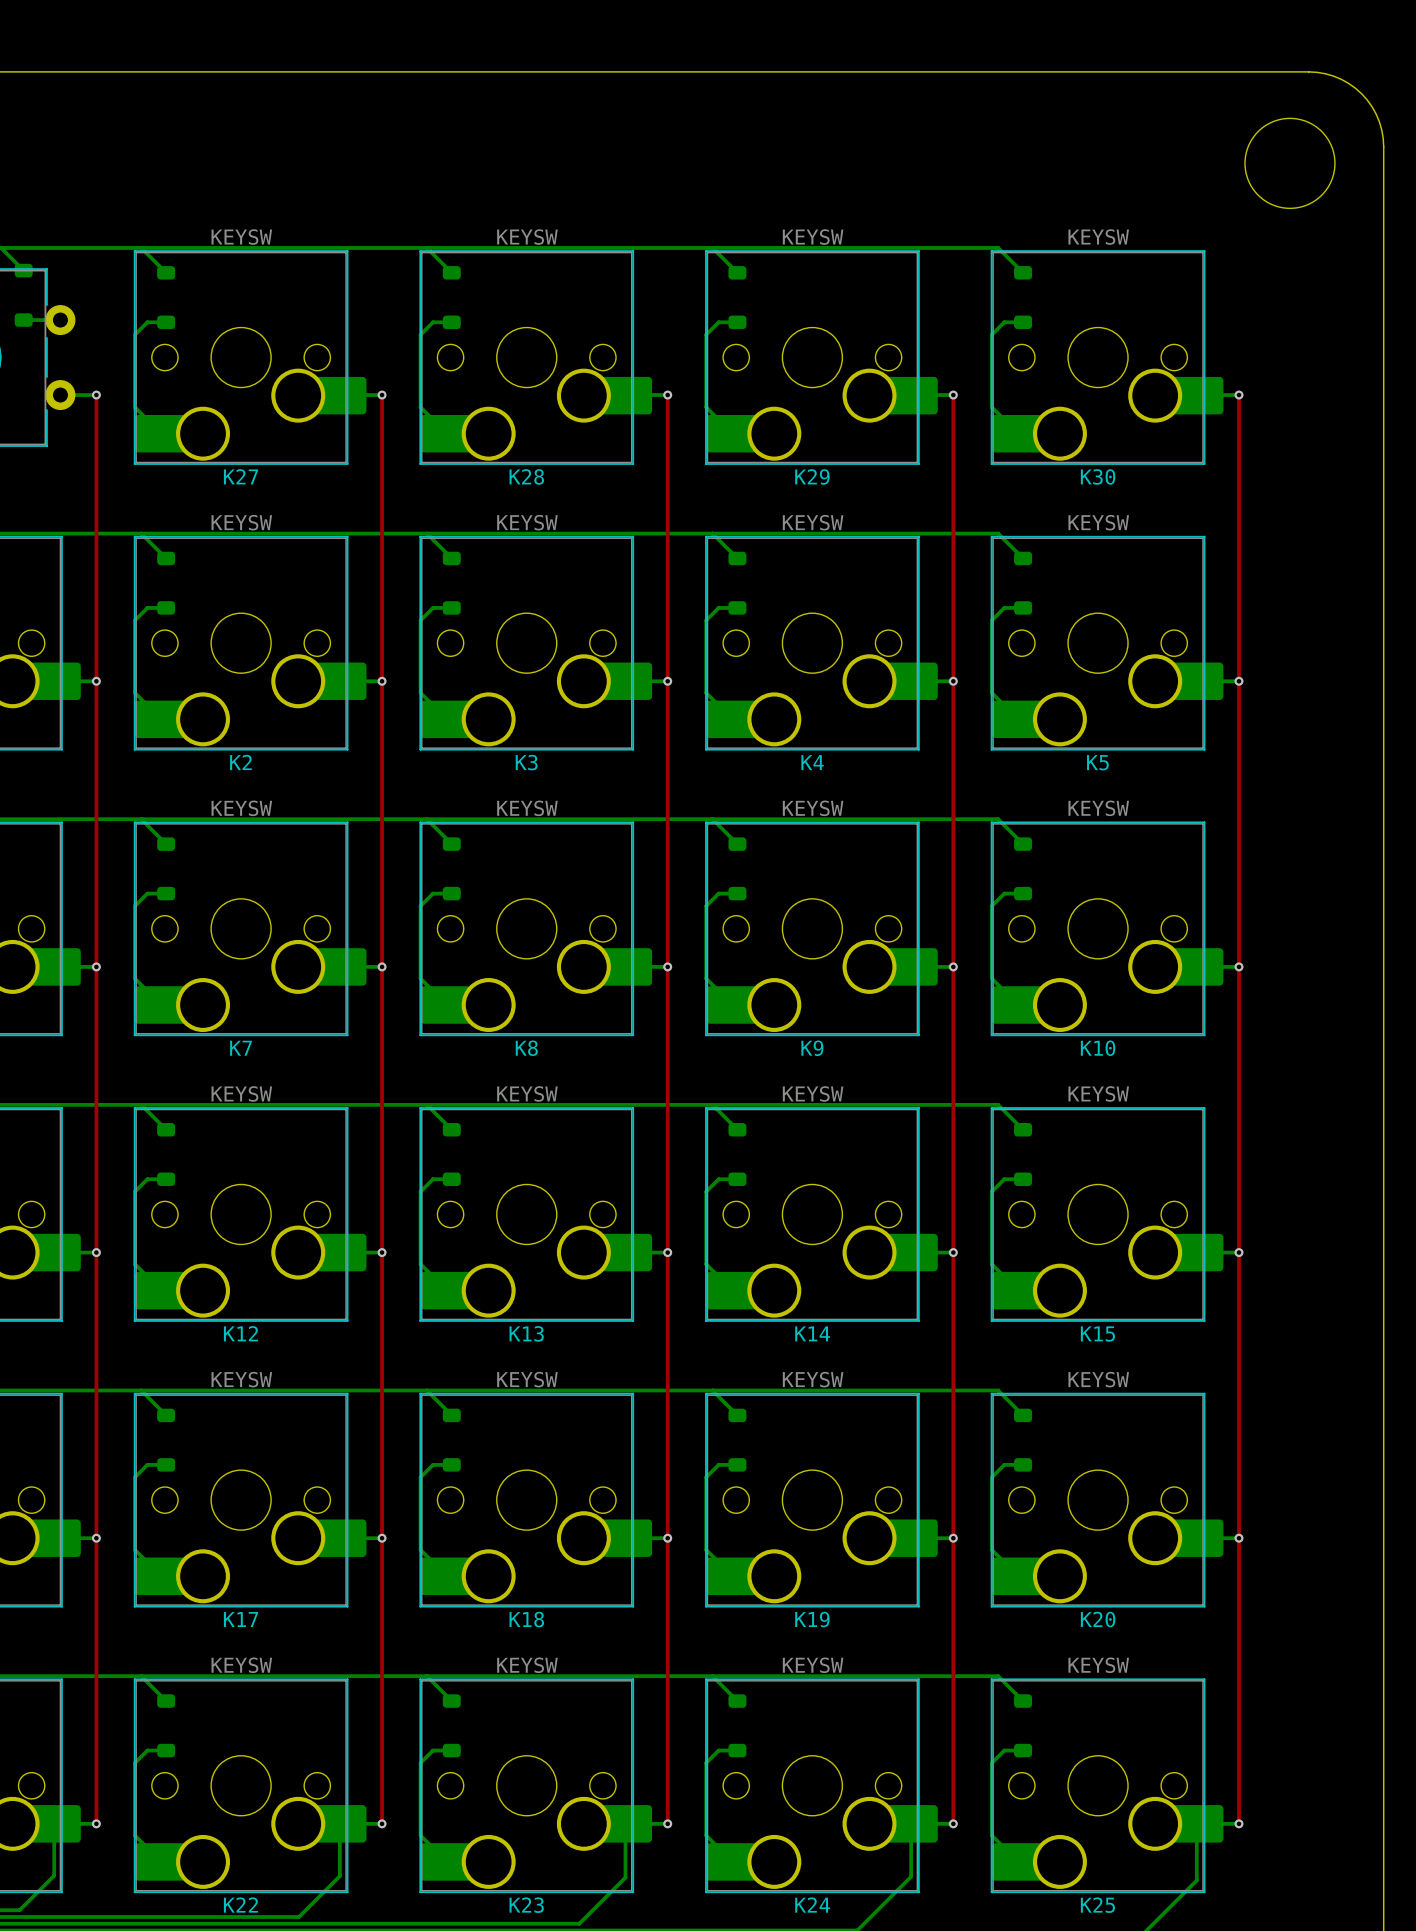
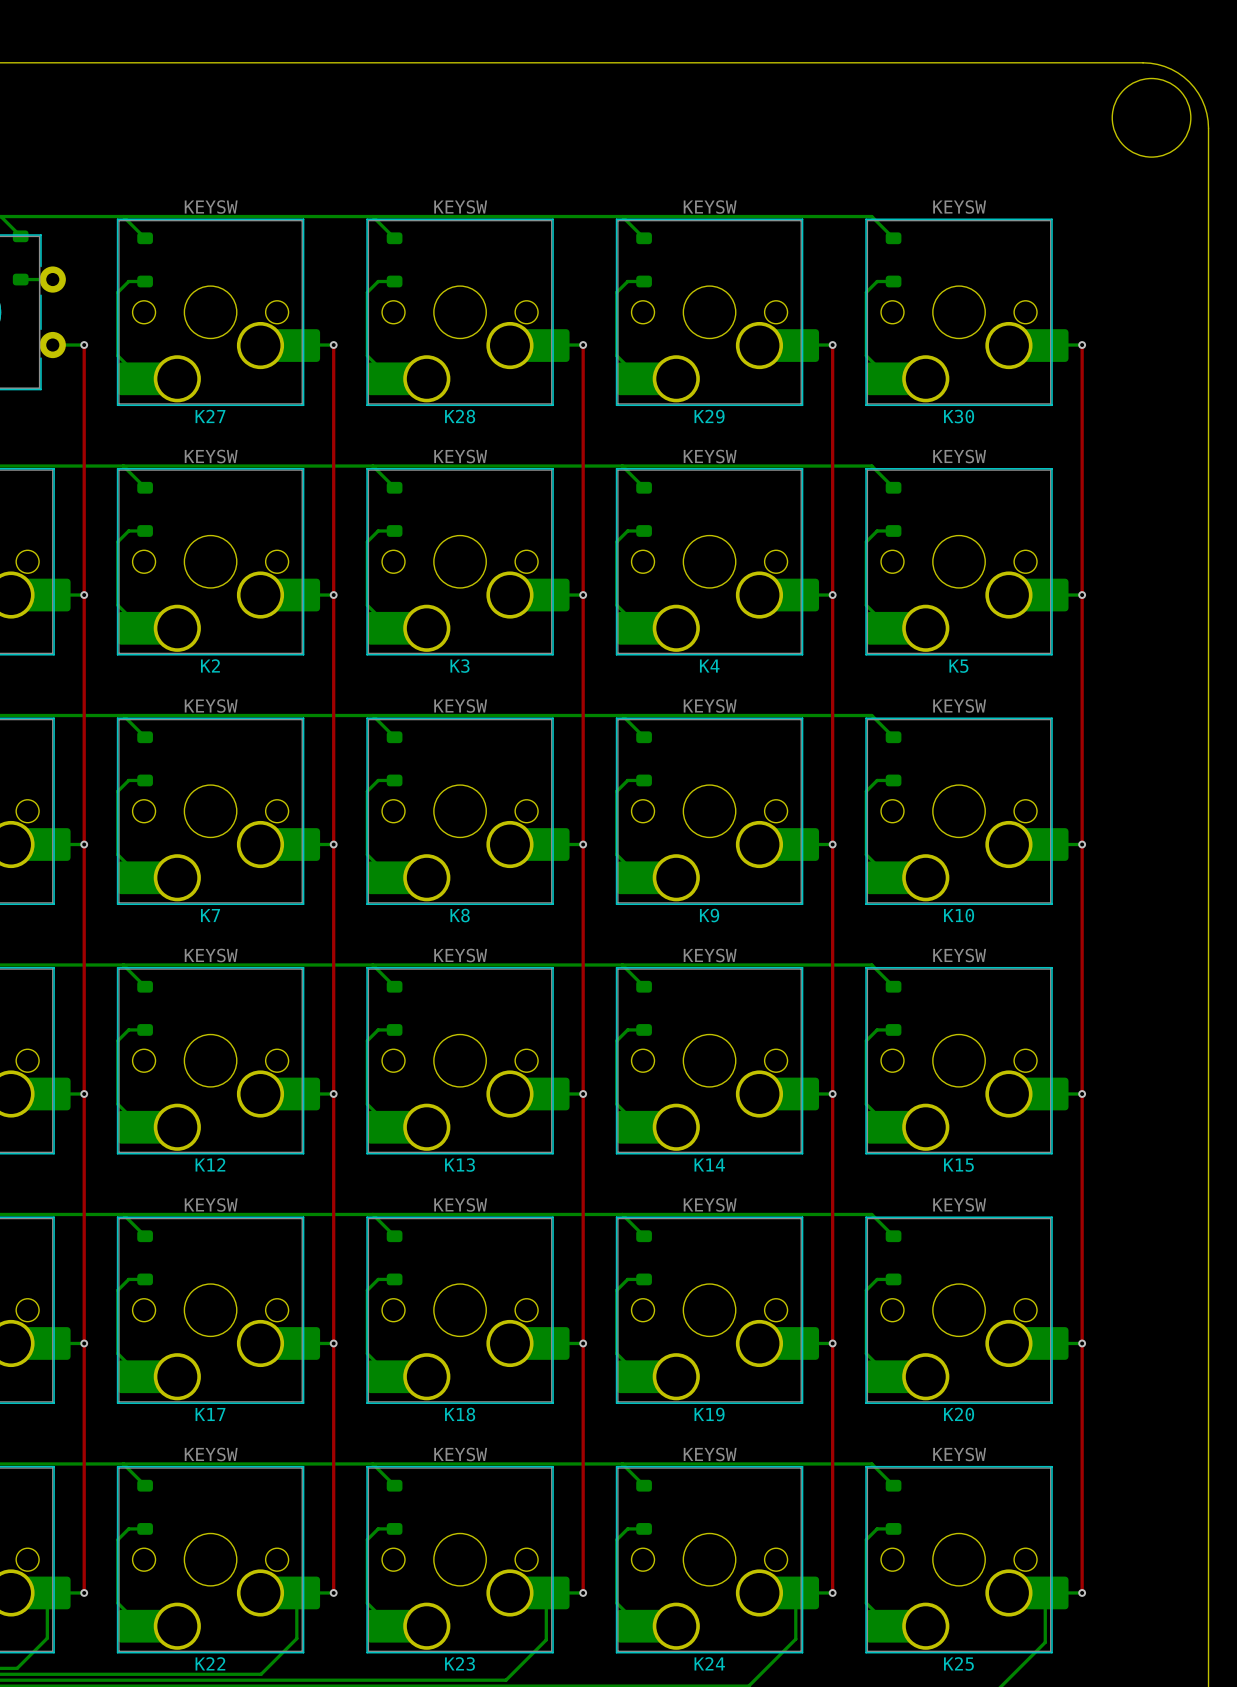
round board edge position: (1289, 163) -> (1151, 117)

